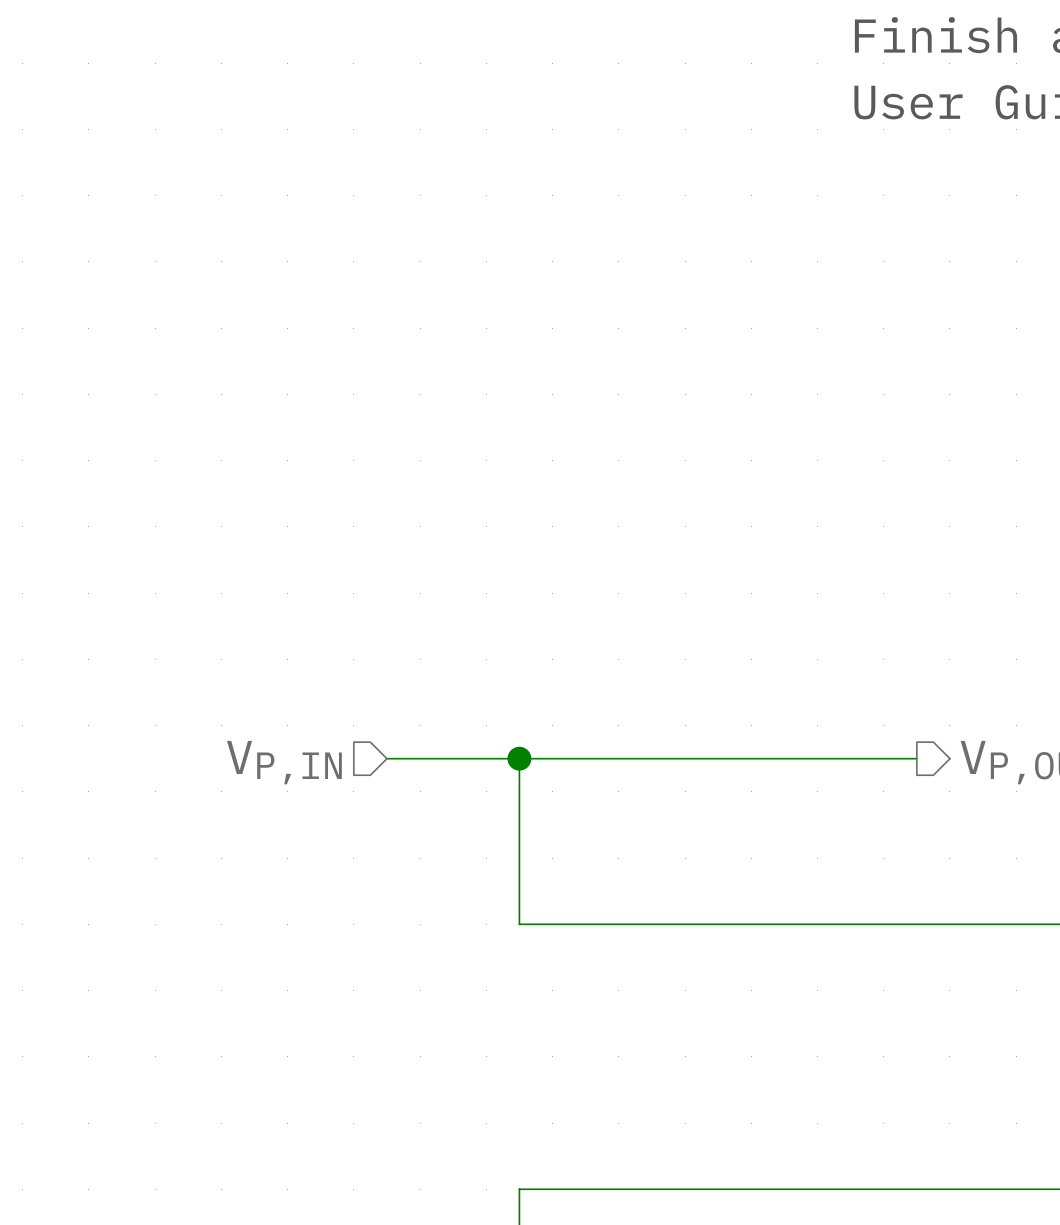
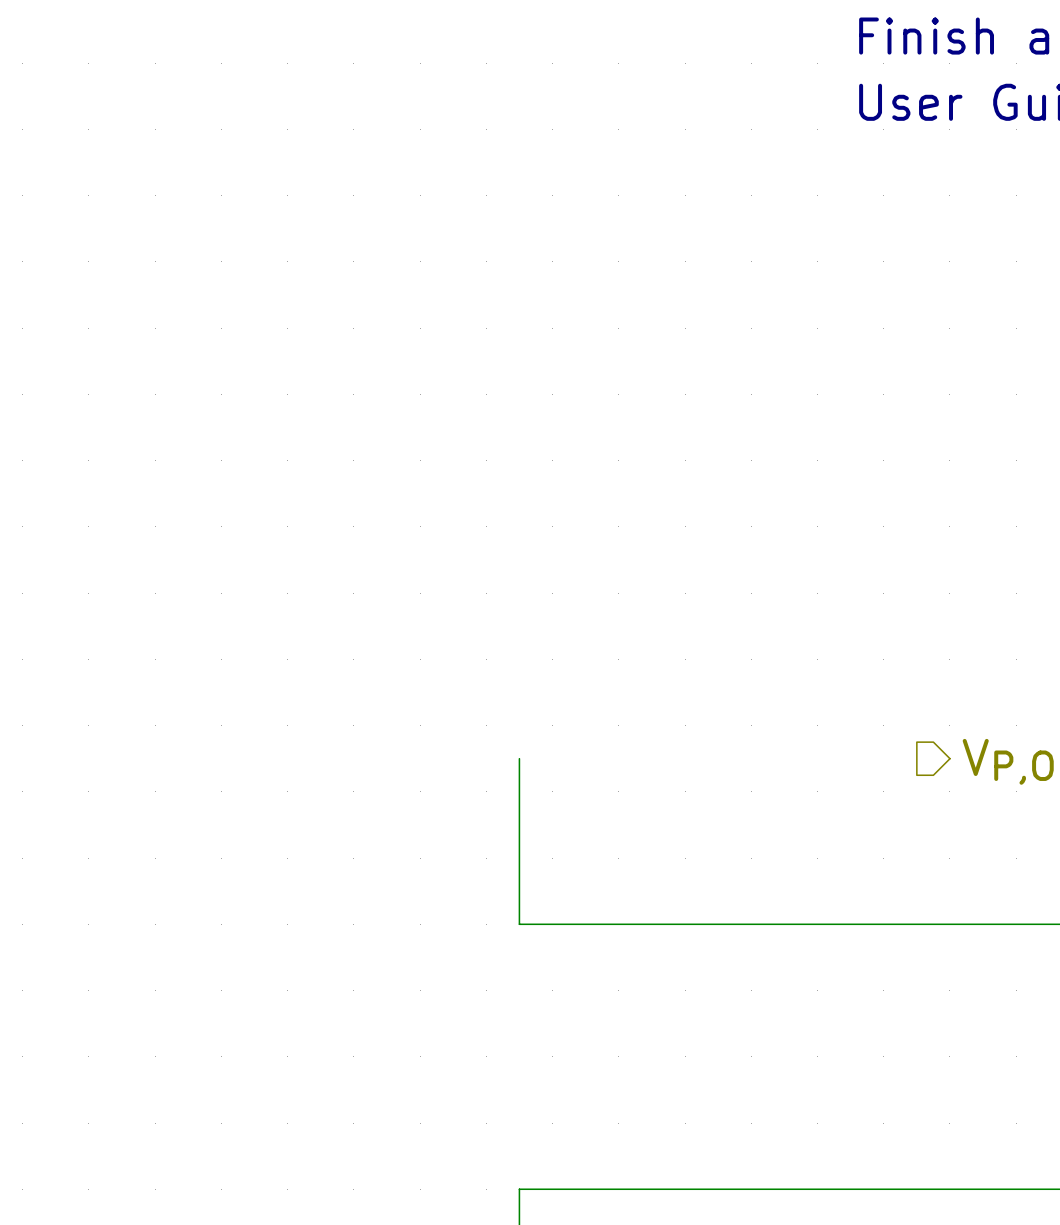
wire: (386, 758) (916, 758) -> none
junction: (519, 758) -> none
hierarchical label: VP,IN (284, 762) -> none

